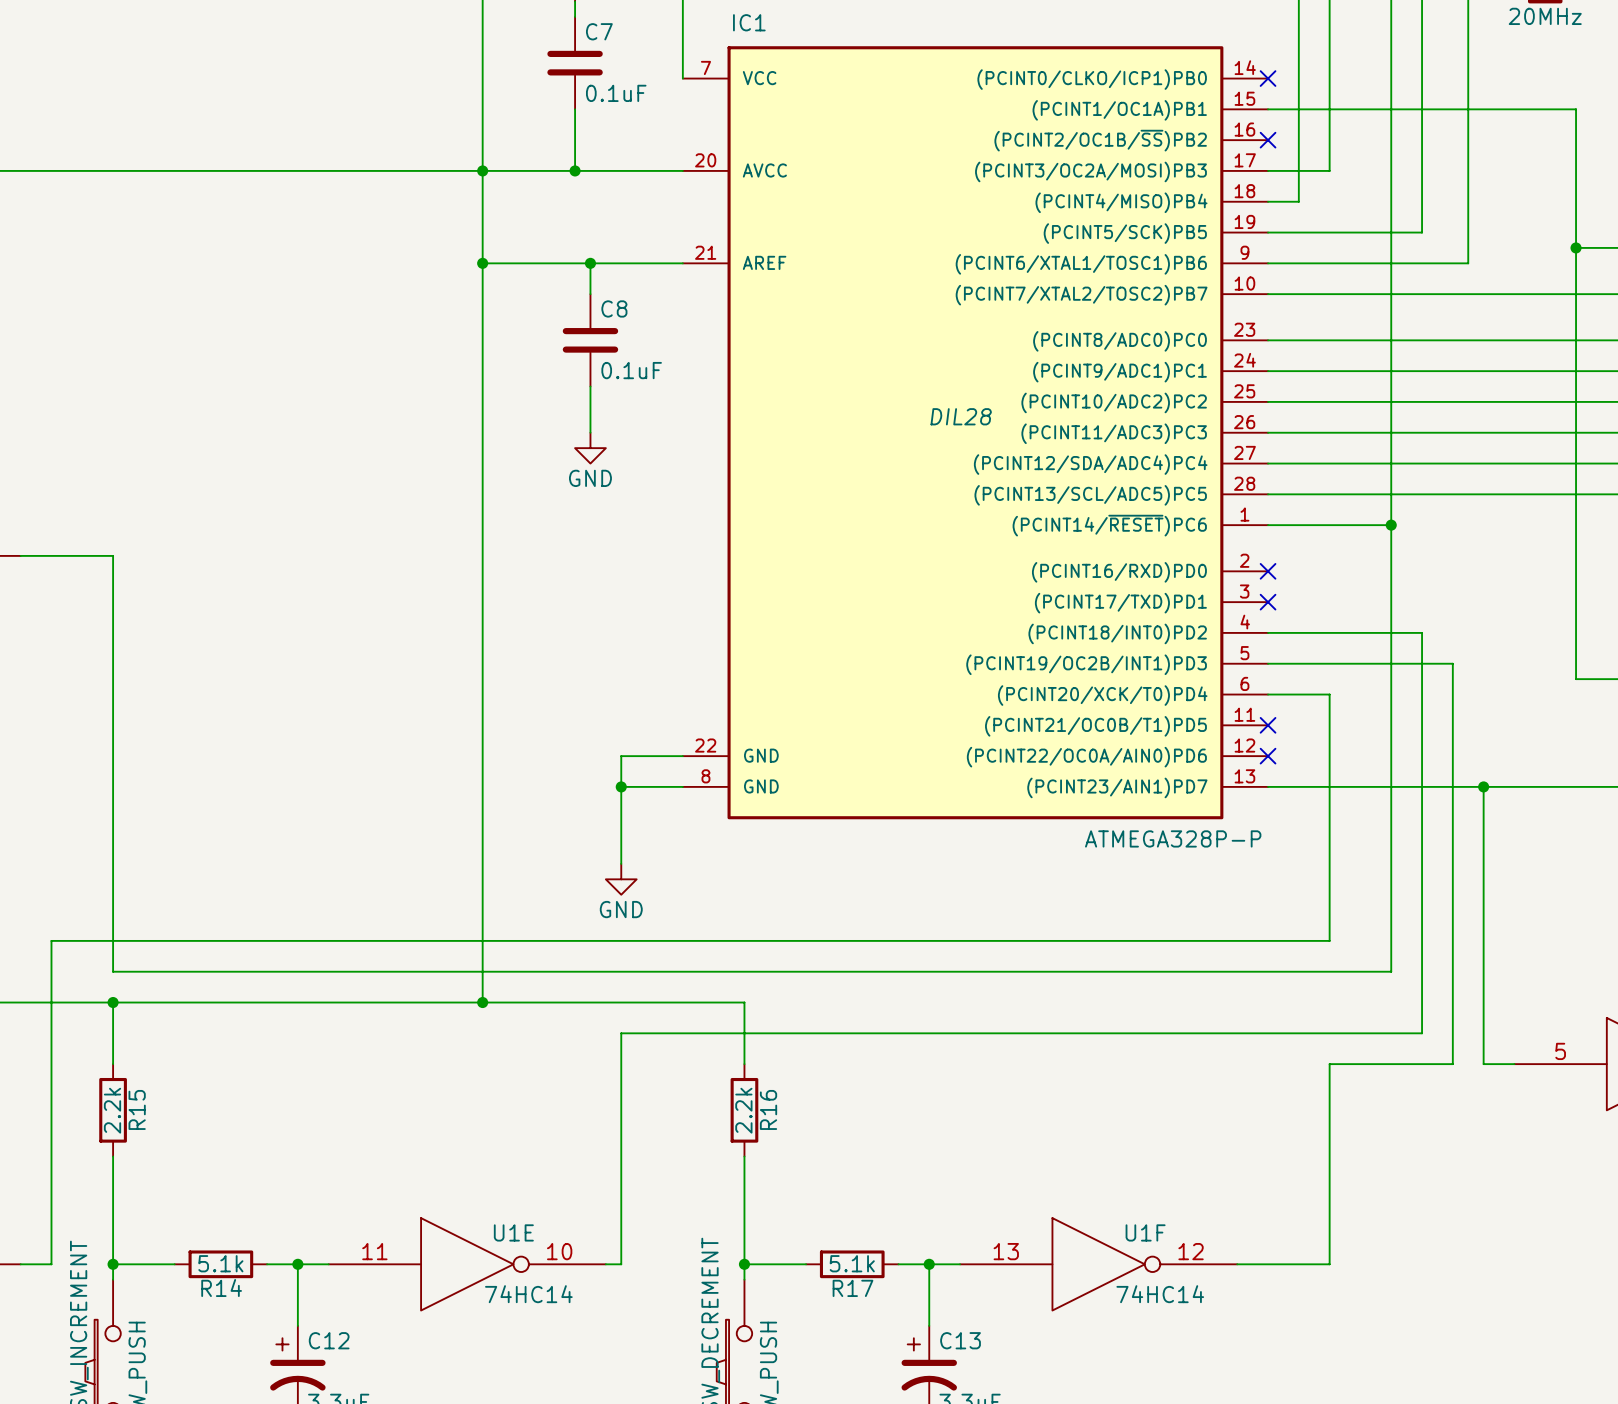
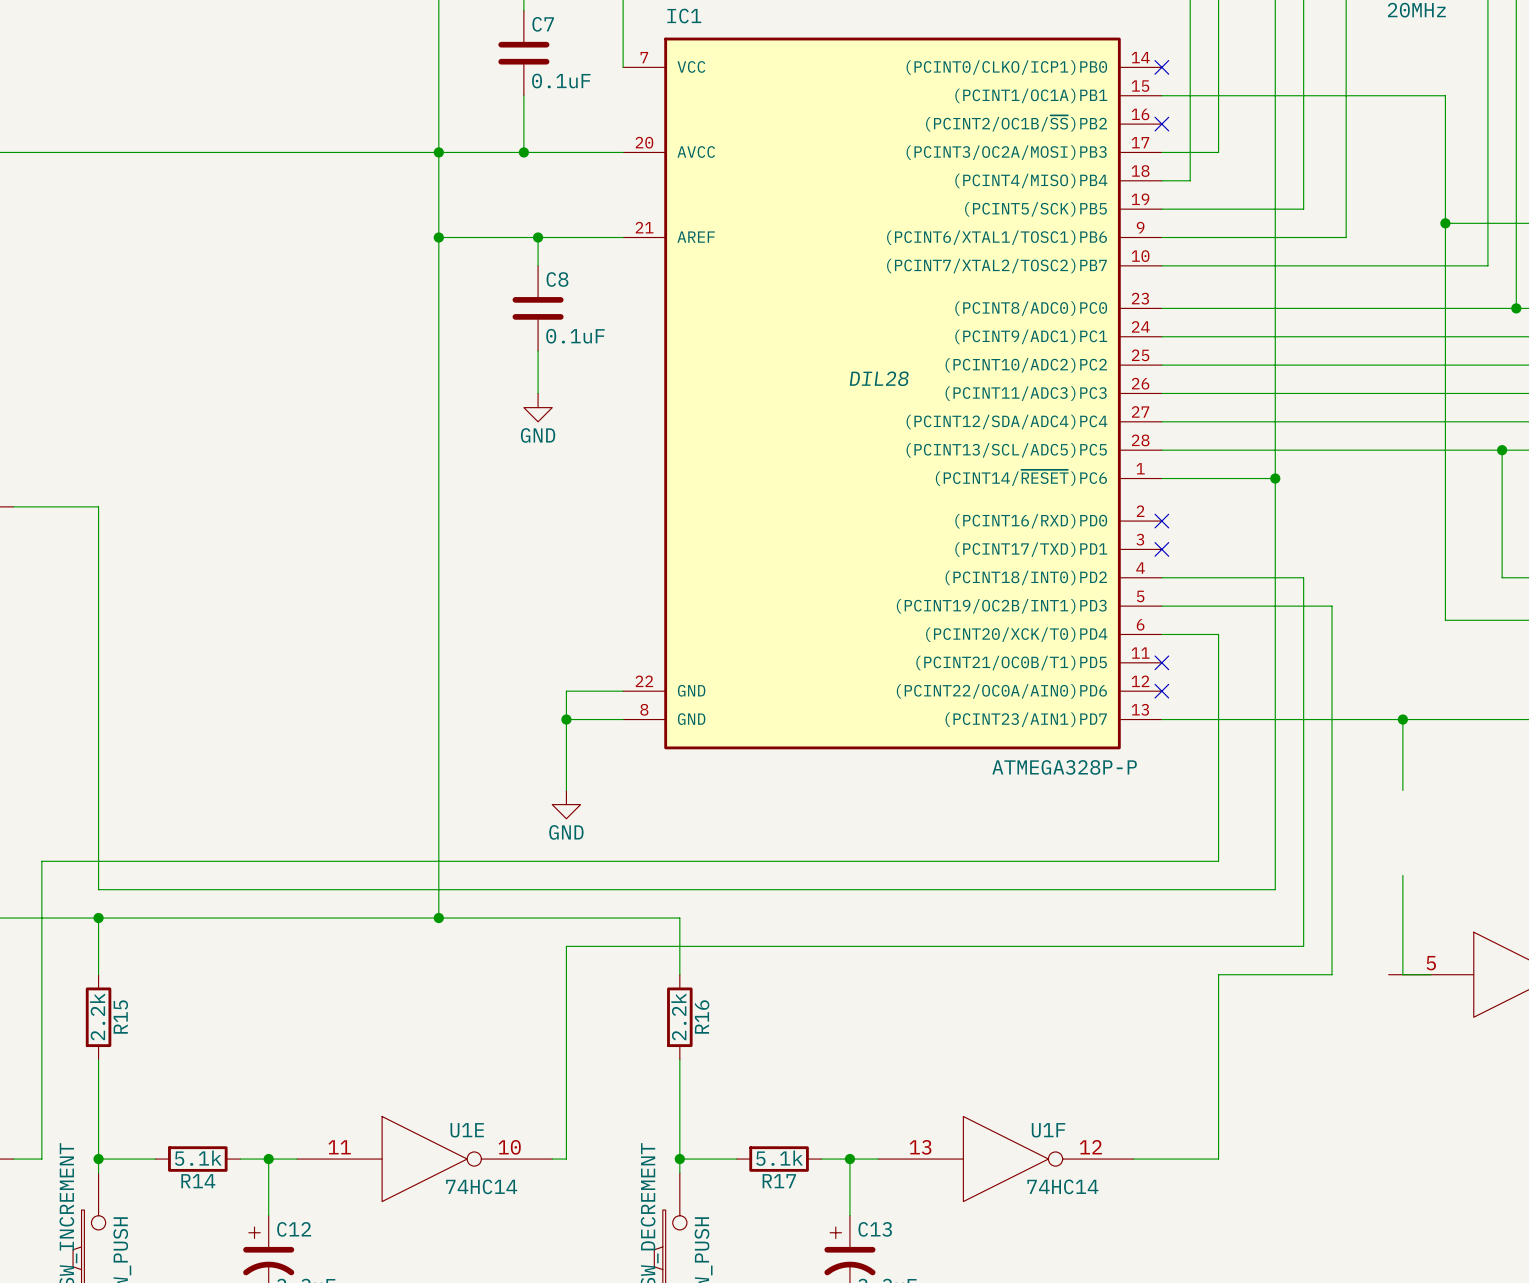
wire: (1483, 786) (1483, 1064) (1514, 1064) -> none
junction position: (1483, 786) -> (1402, 719)
wire: none -> (1402, 719) (1402, 790)
wire: none -> (1402, 875) (1402, 974) (1431, 974)

